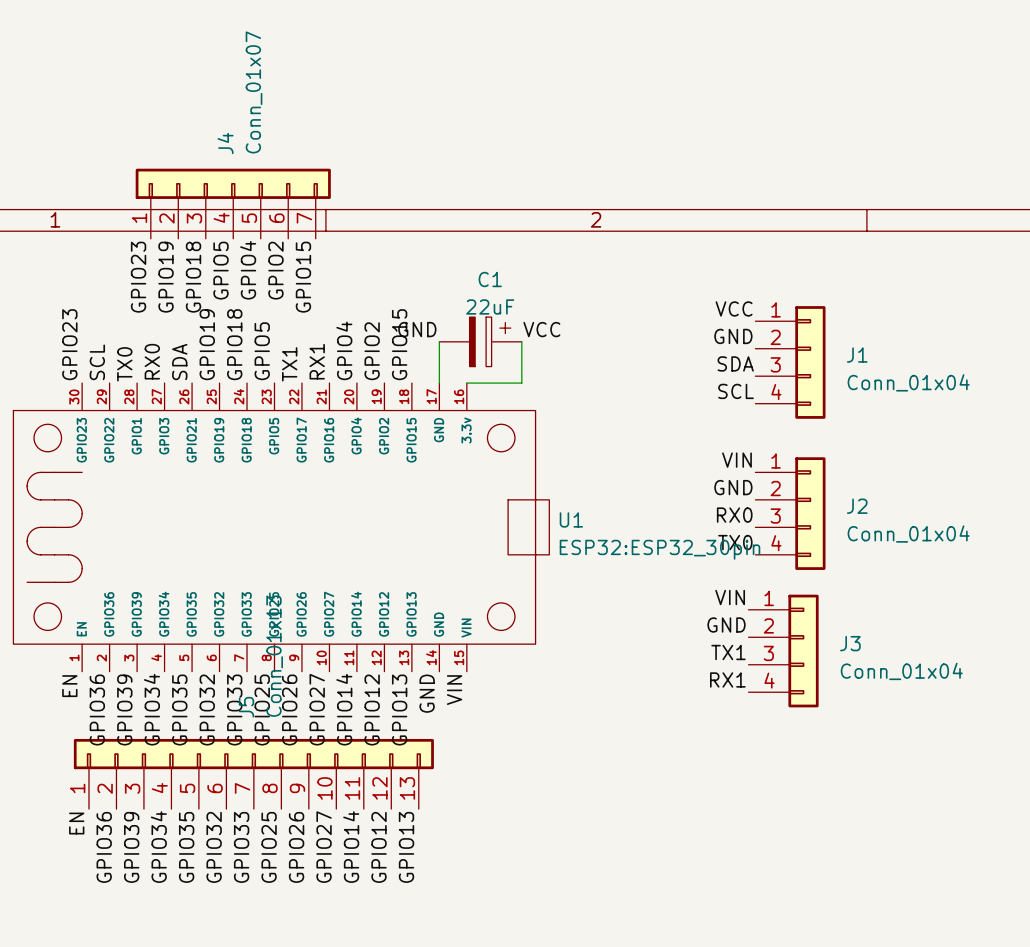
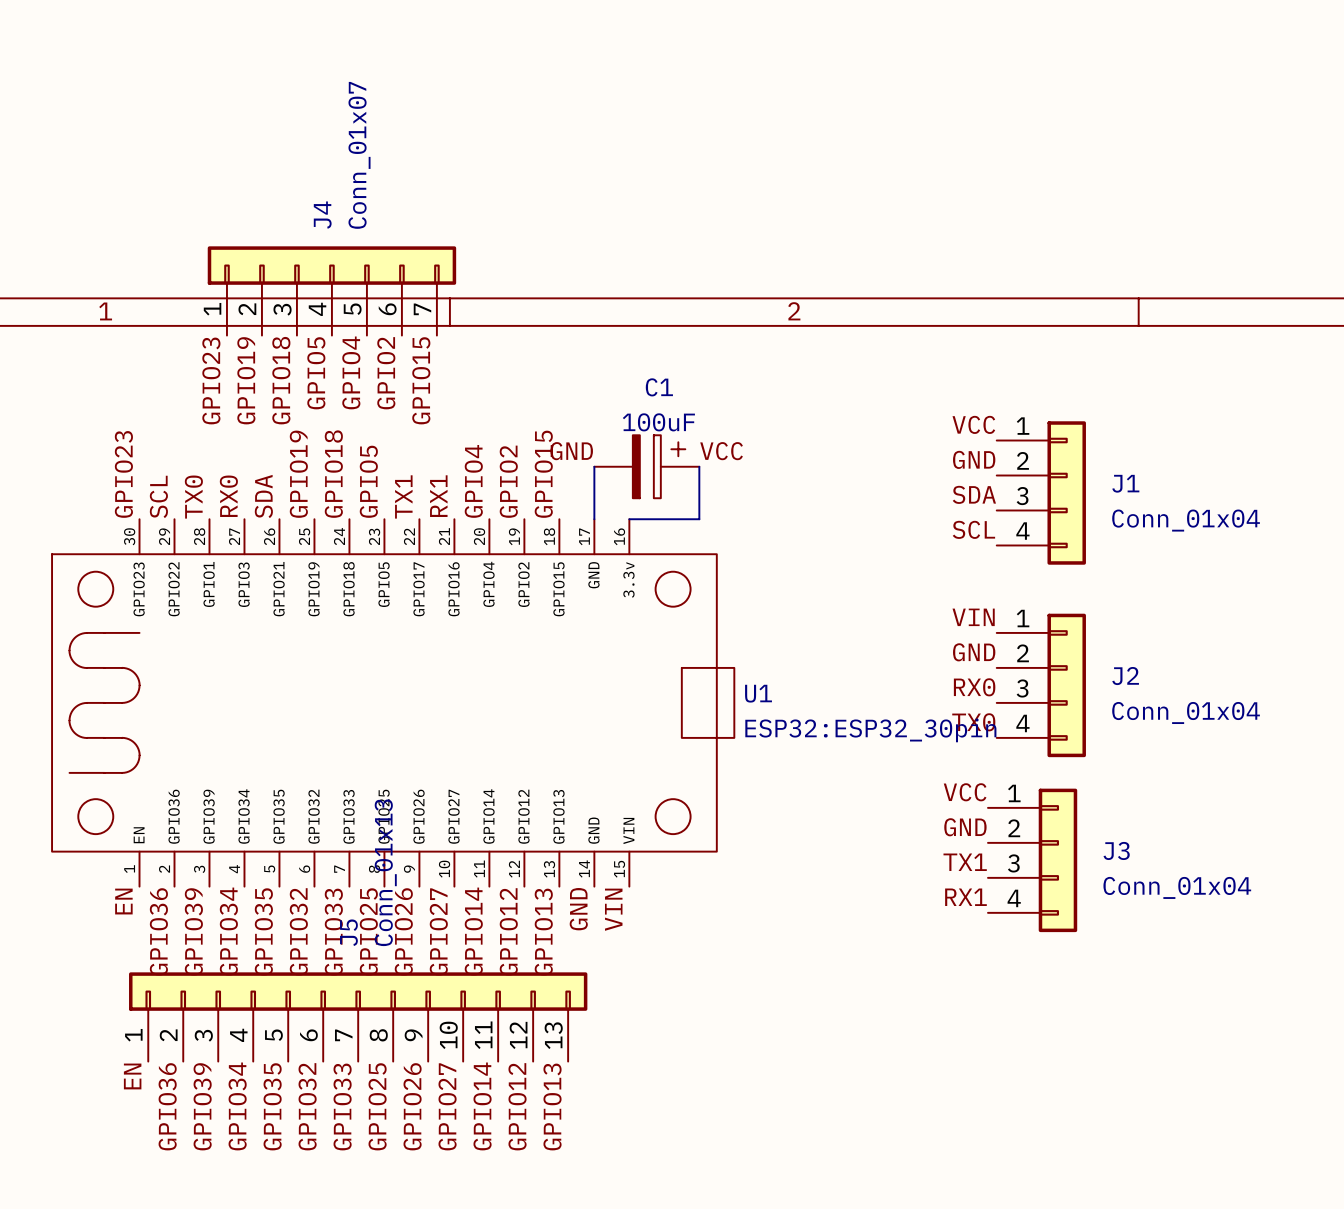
C1 value: 22uF (490, 306) -> 100uF (658, 422)
label: VIN (730, 597) -> VCC (965, 792)

